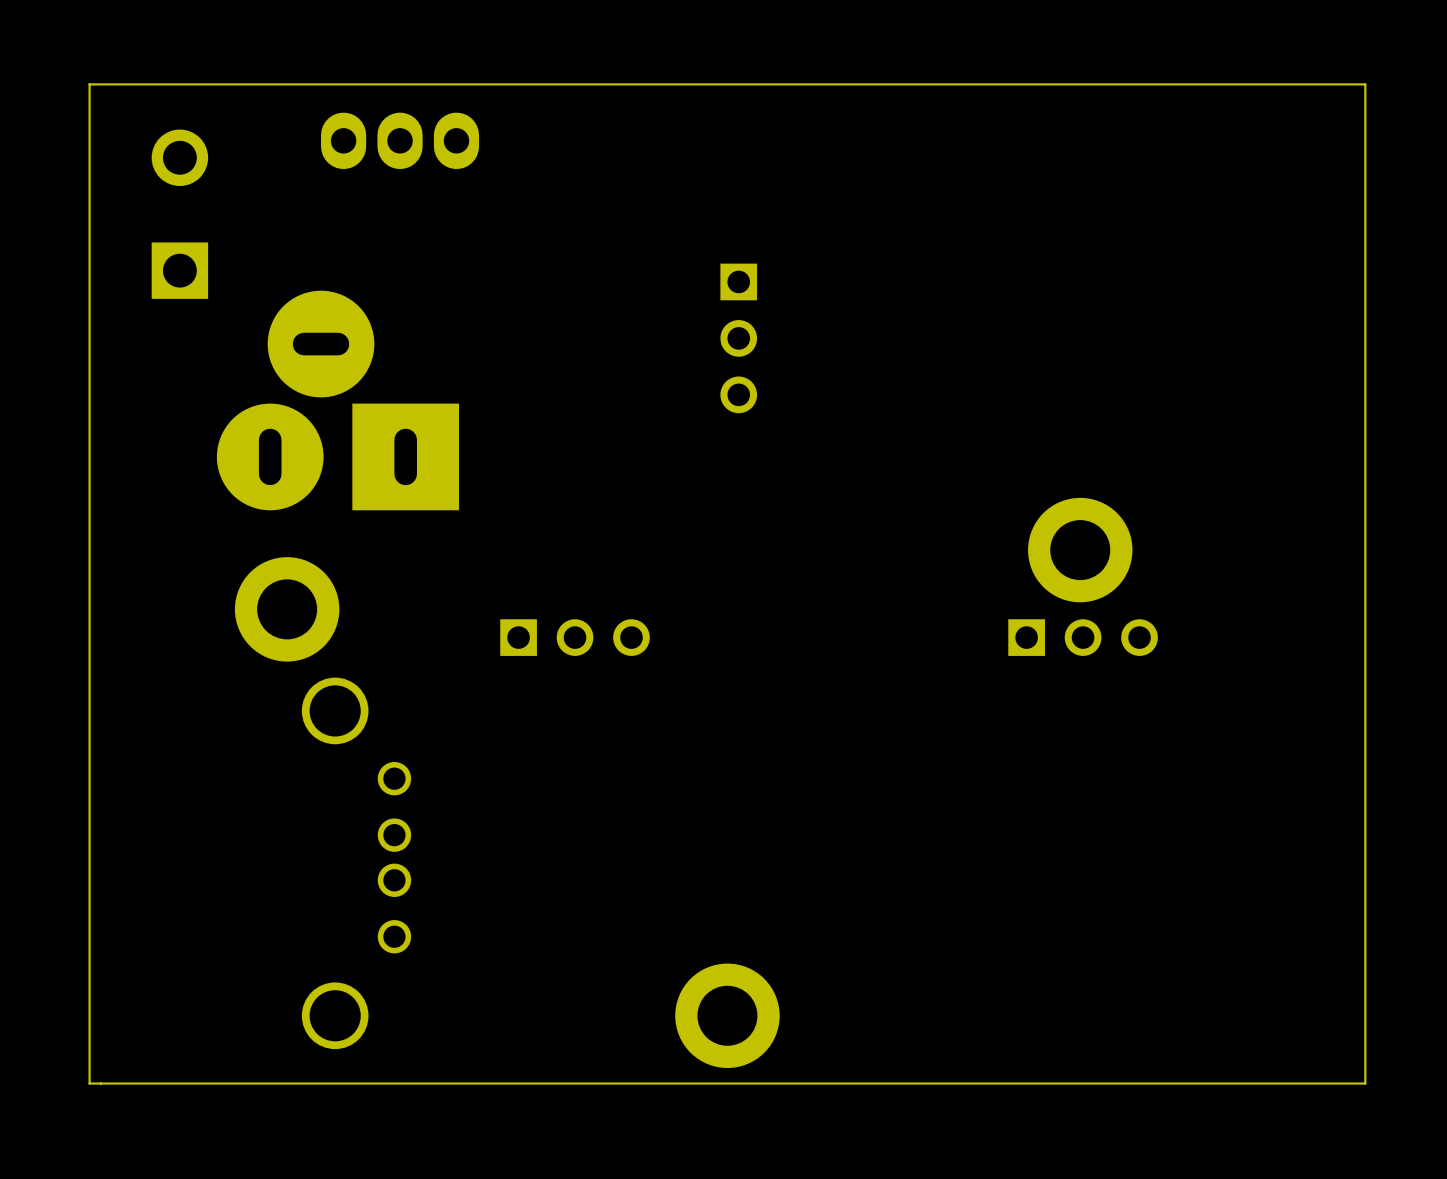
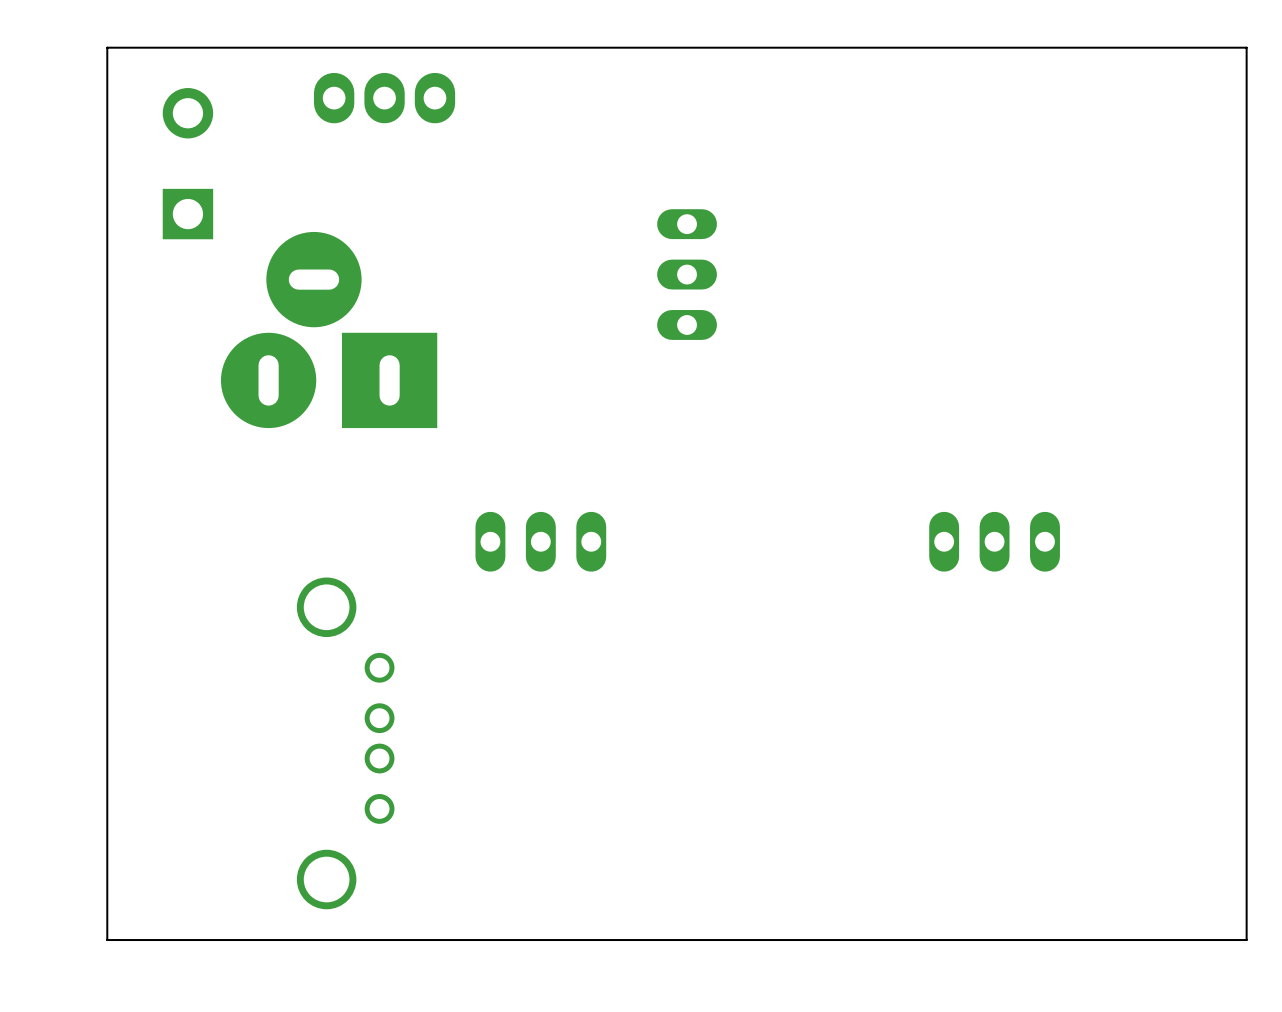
part footprint: [720, 263, 758, 414] -> [657, 209, 717, 340]
part: (1080, 550) -> none
part: (287, 609) -> none
part footprint: [500, 619, 650, 656] -> [475, 511, 607, 572]
part footprint: [1008, 619, 1158, 656] -> [929, 511, 1060, 572]
part: (727, 1015) -> none

